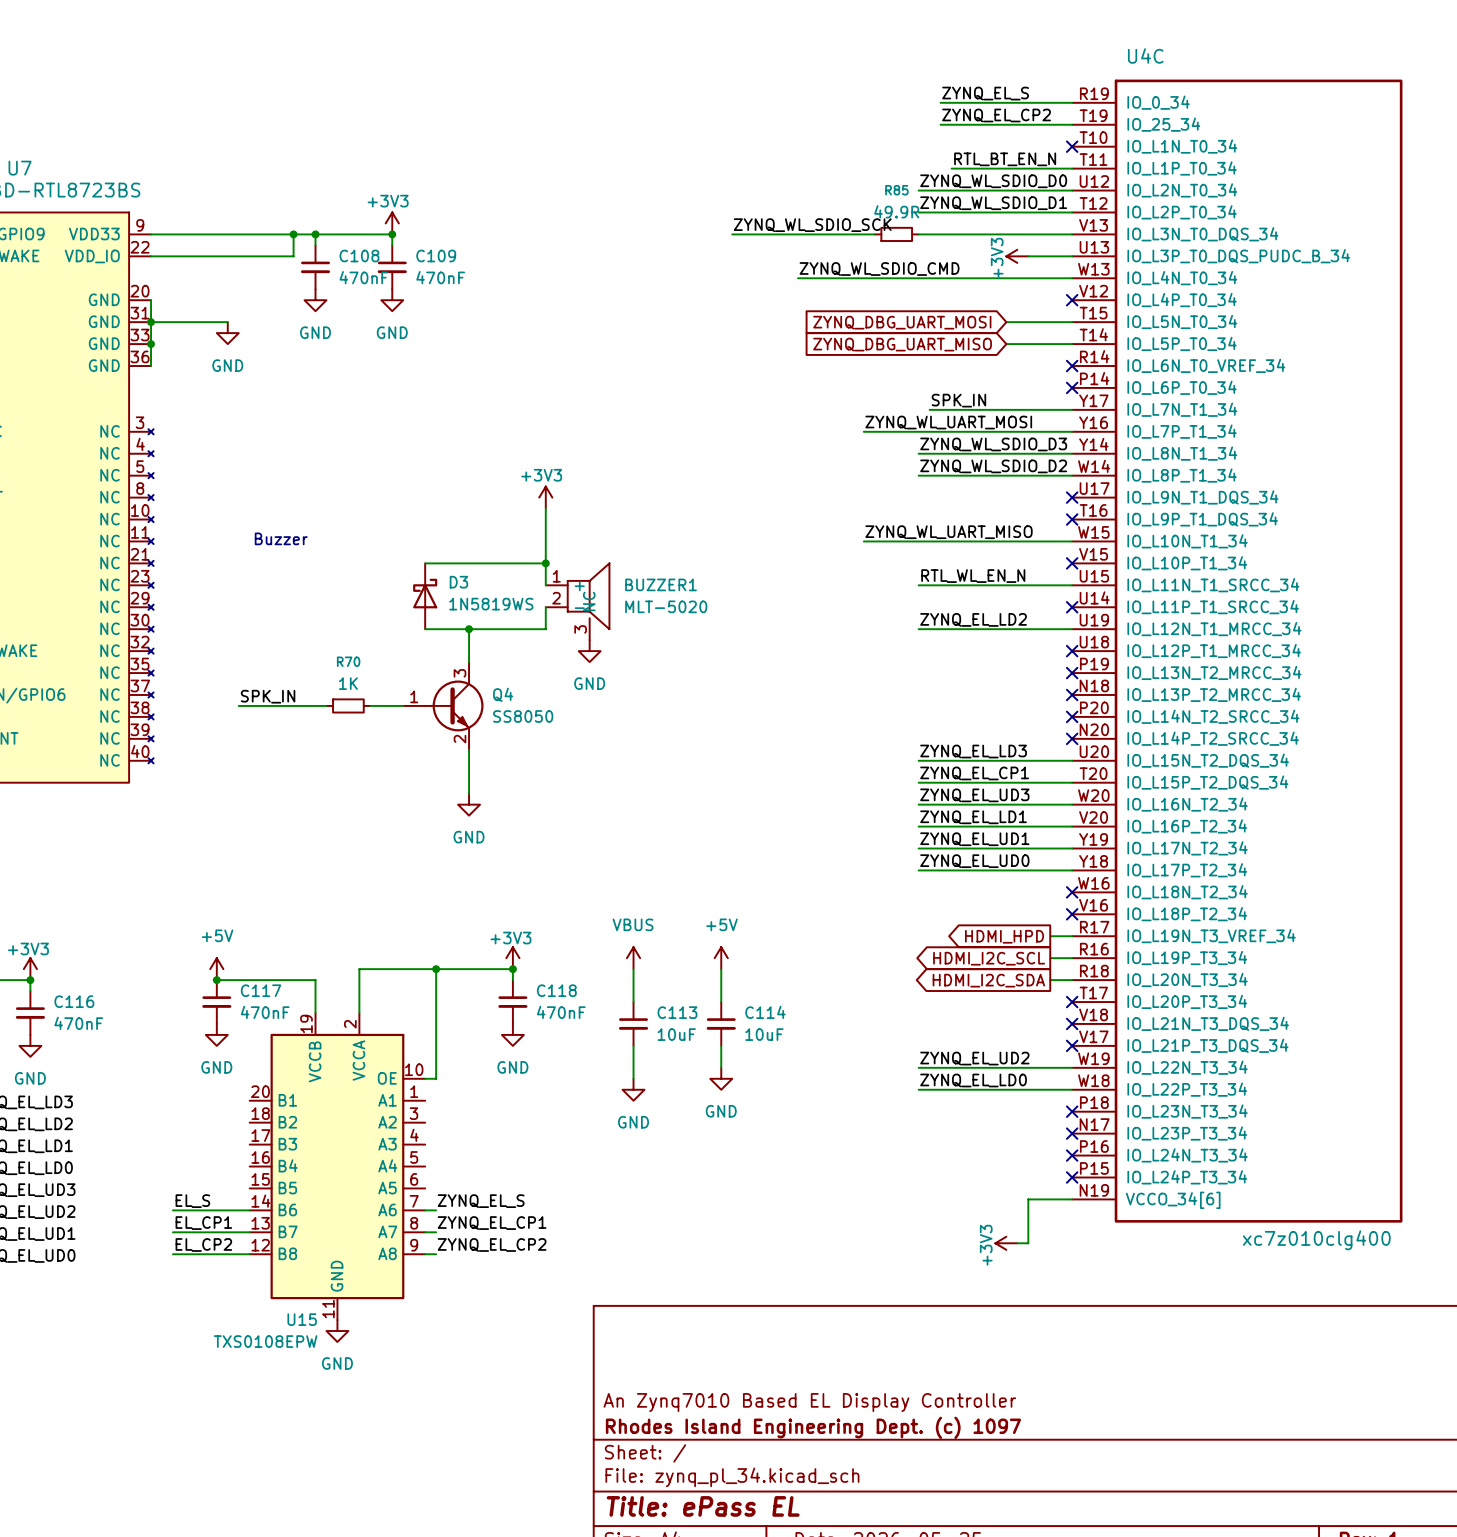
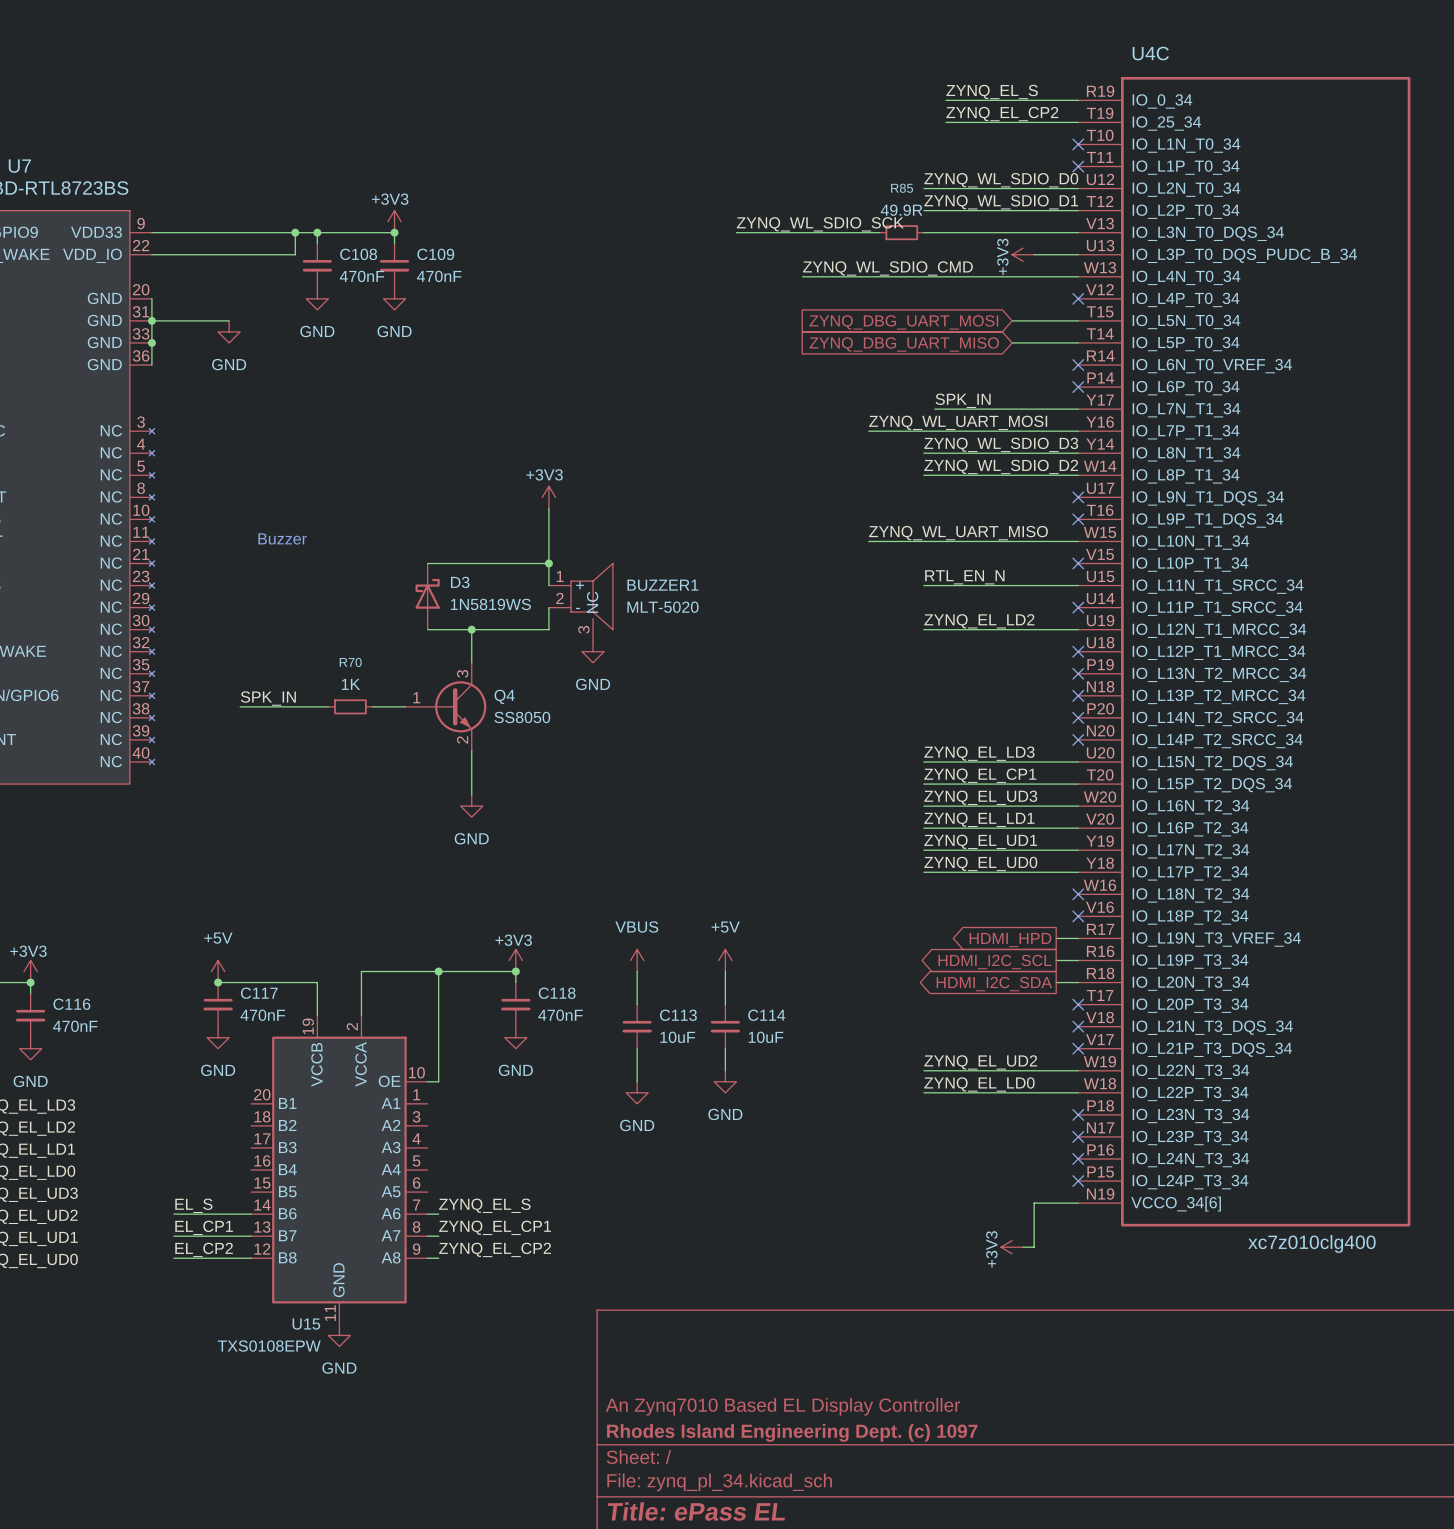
label: RTL_BT_EN_N (1005, 159) -> none
wire: (951, 168) (1072, 168) -> none
no-connect mark: none -> (1078, 166)
label: RTL_WL_EN_N (973, 576) -> RTL_EN_N (964, 577)

